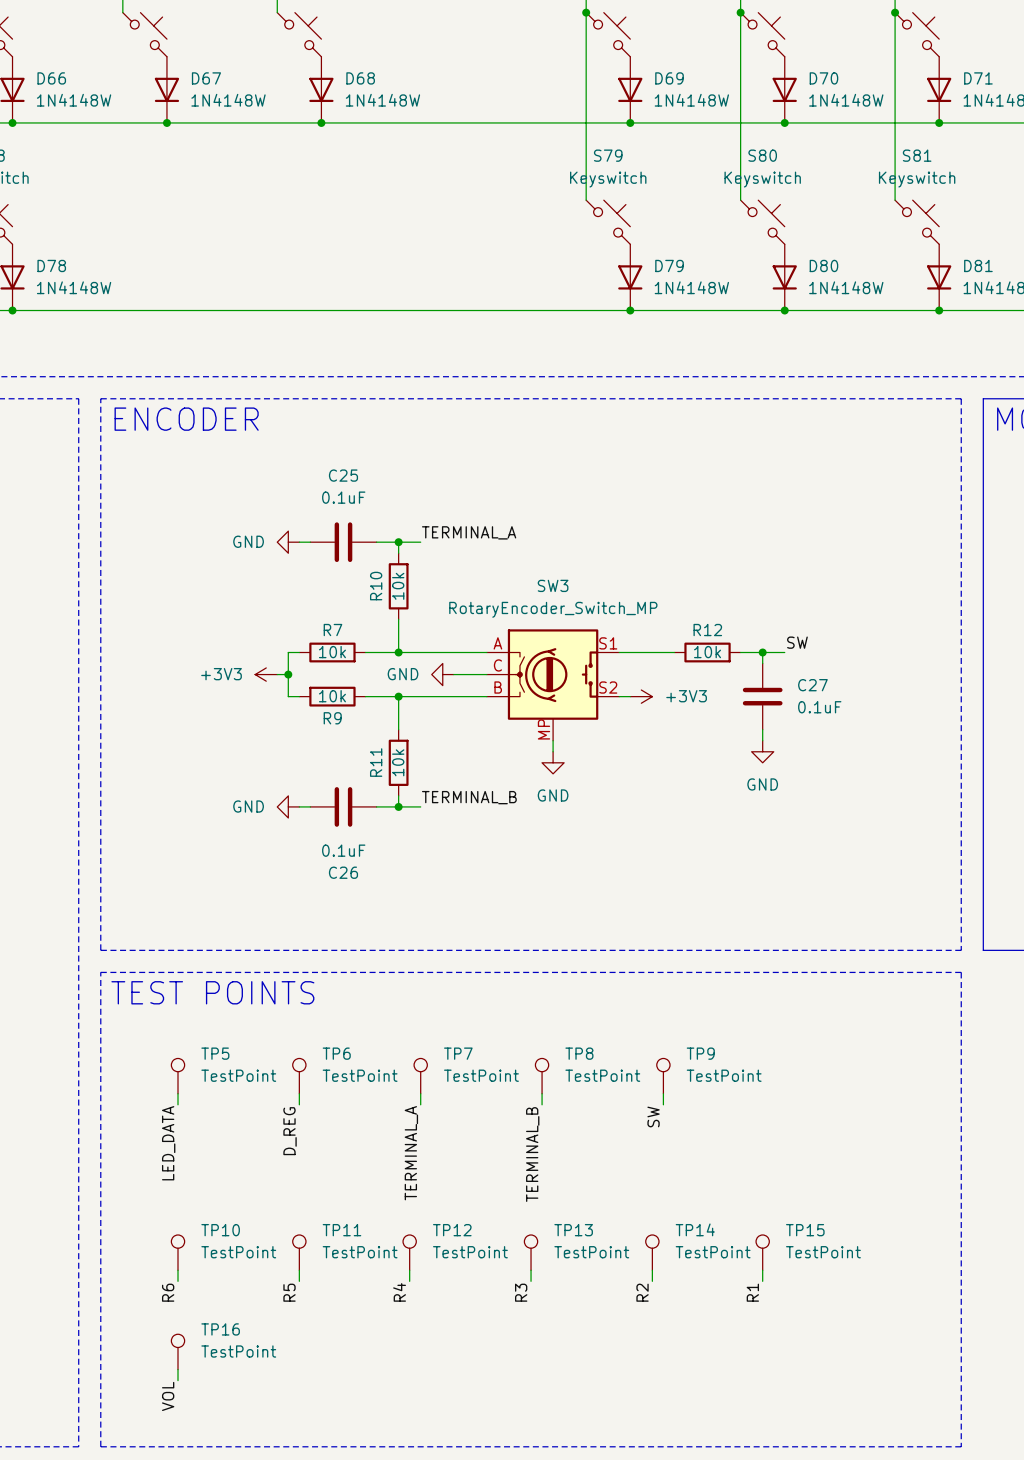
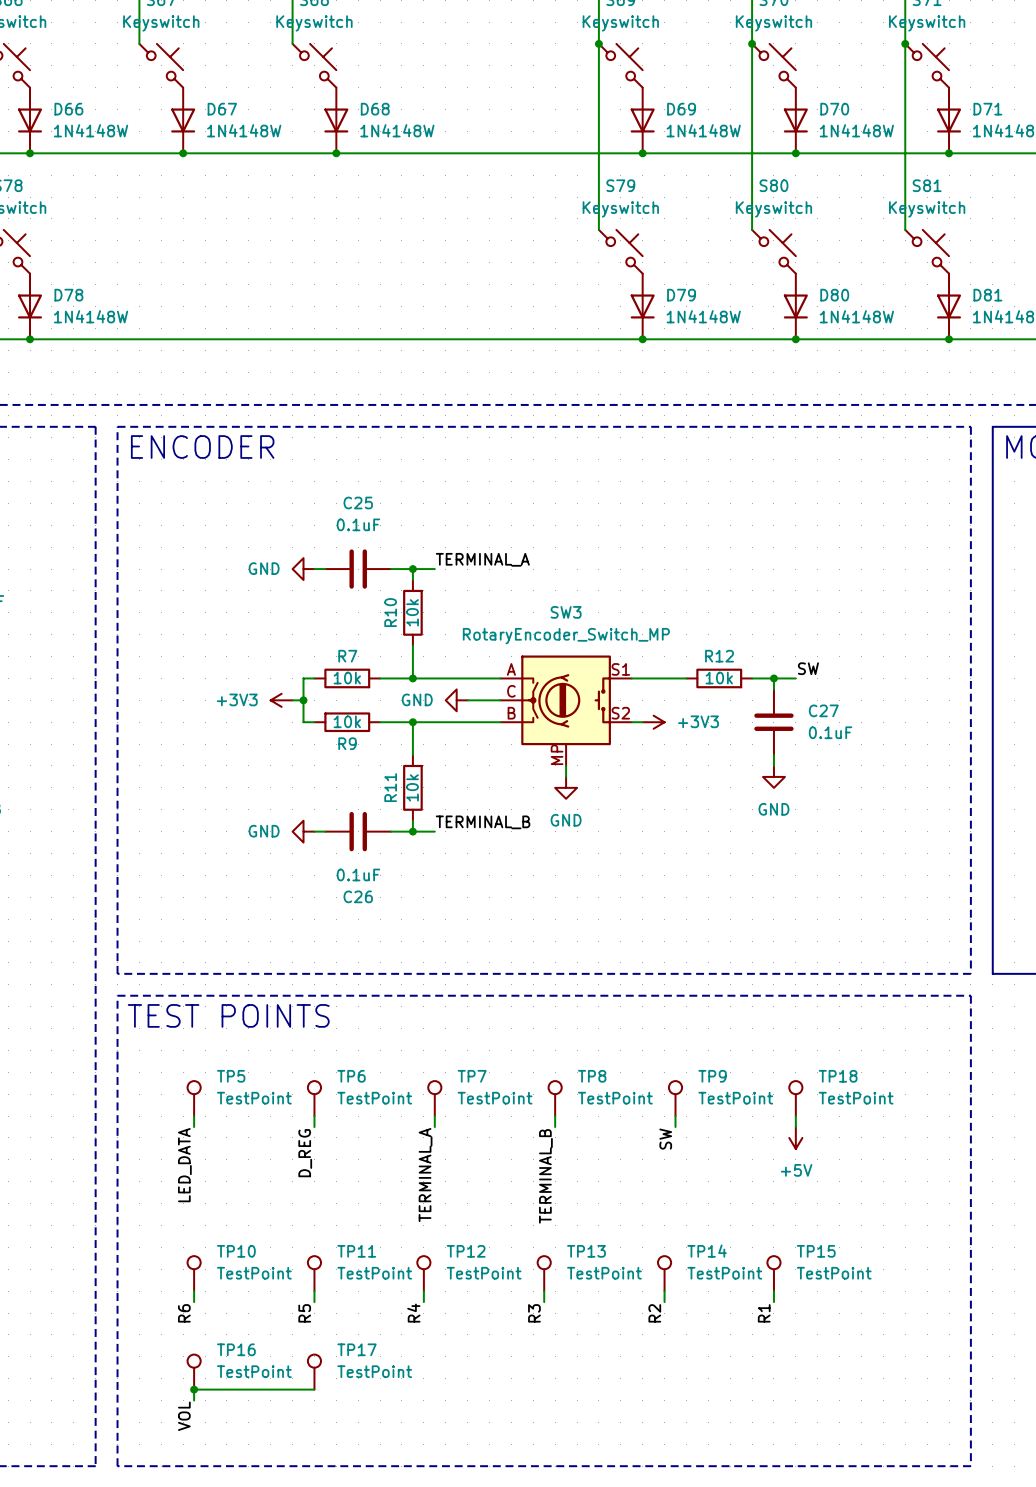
TP18: none -> TestPoint (795, 1098)
wire: none -> (795, 1116) (795, 1127)
power symbol: none -> +5V (795, 1137)
TP17: none -> TestPoint (314, 1372)
wire: none -> (194, 1389) (314, 1389)
junction: none -> (194, 1389)

